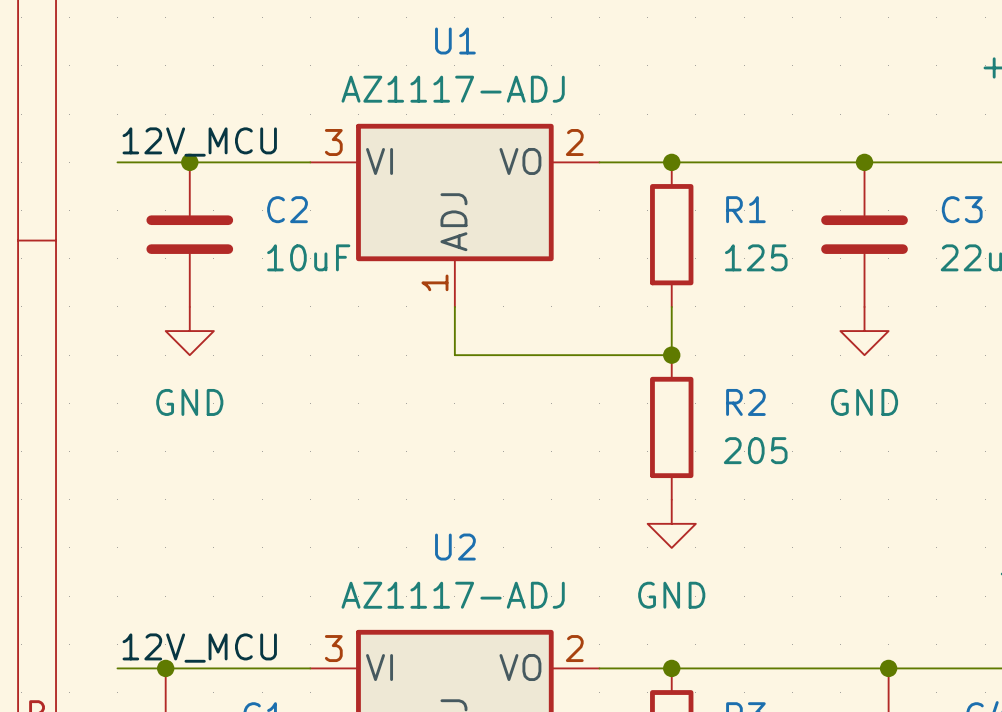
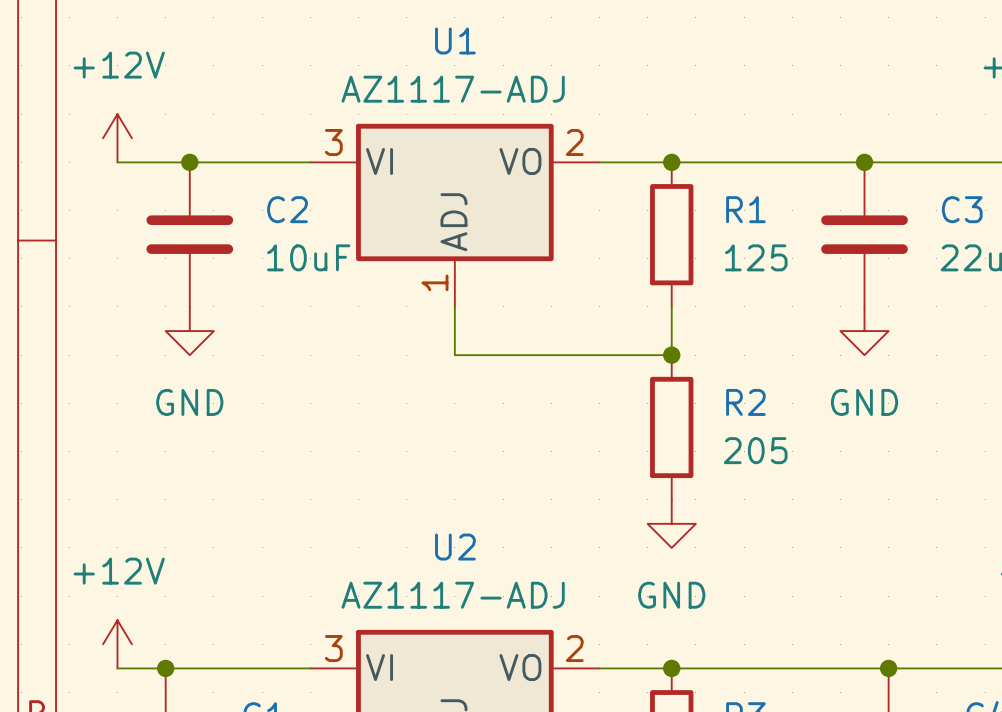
power symbol: none -> +12V (117, 138)
label: 12V_MCU (199, 142) -> none
power symbol: none -> +12V (117, 644)
label: 12V_MCU (199, 648) -> none

